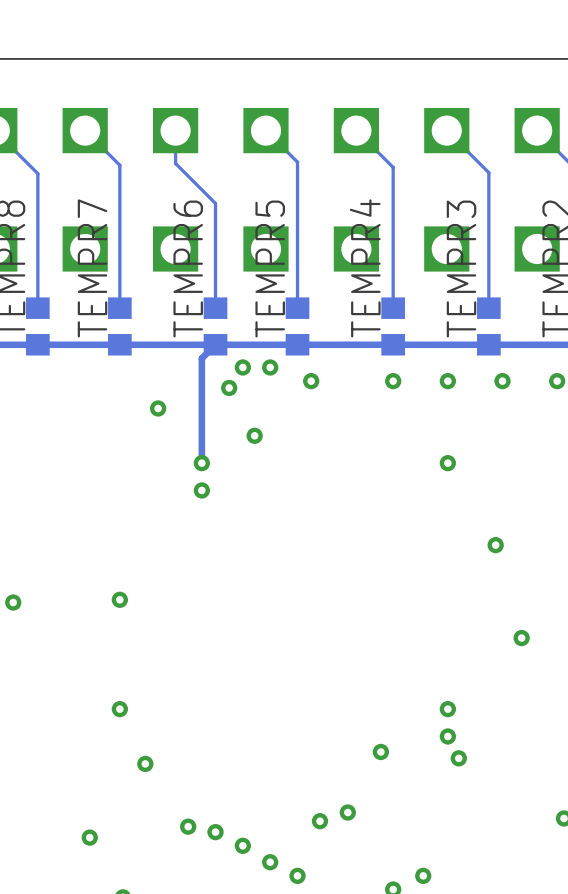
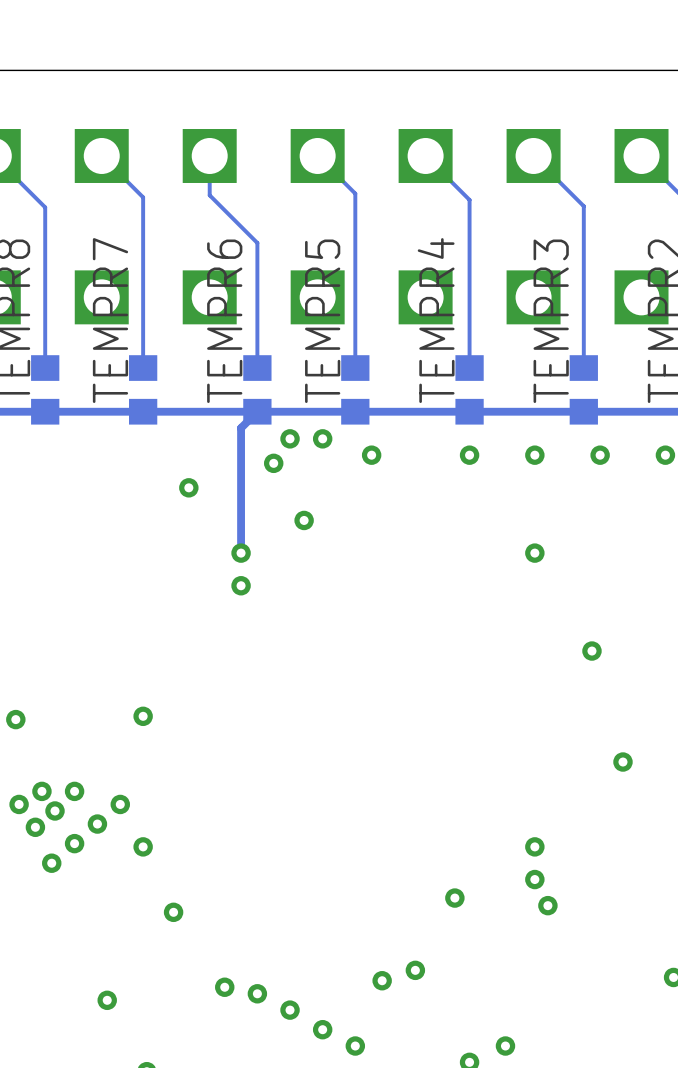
via: none -> (41, 791)
via: none -> (74, 791)
via: none -> (19, 804)
via: none -> (120, 804)
via: none -> (55, 810)
via: none -> (97, 824)
via: none -> (35, 827)
via: none -> (74, 843)
via: none -> (51, 863)

